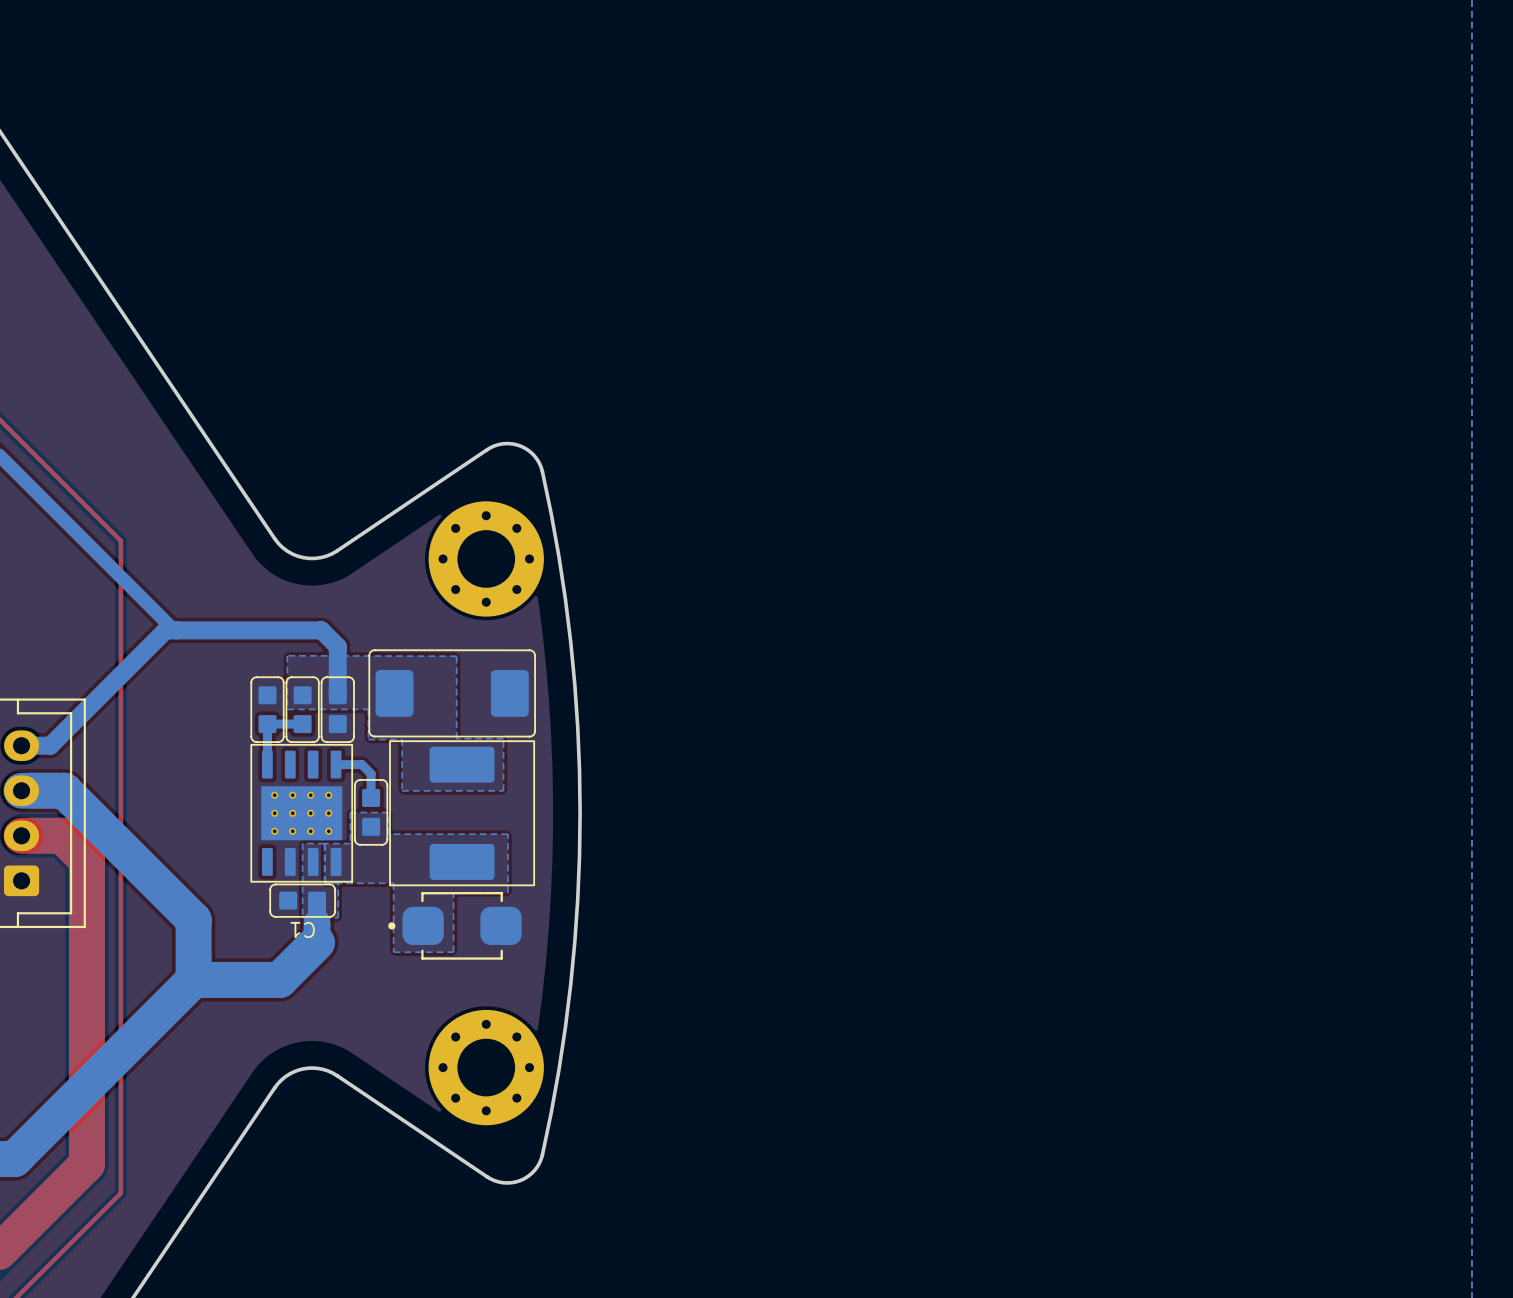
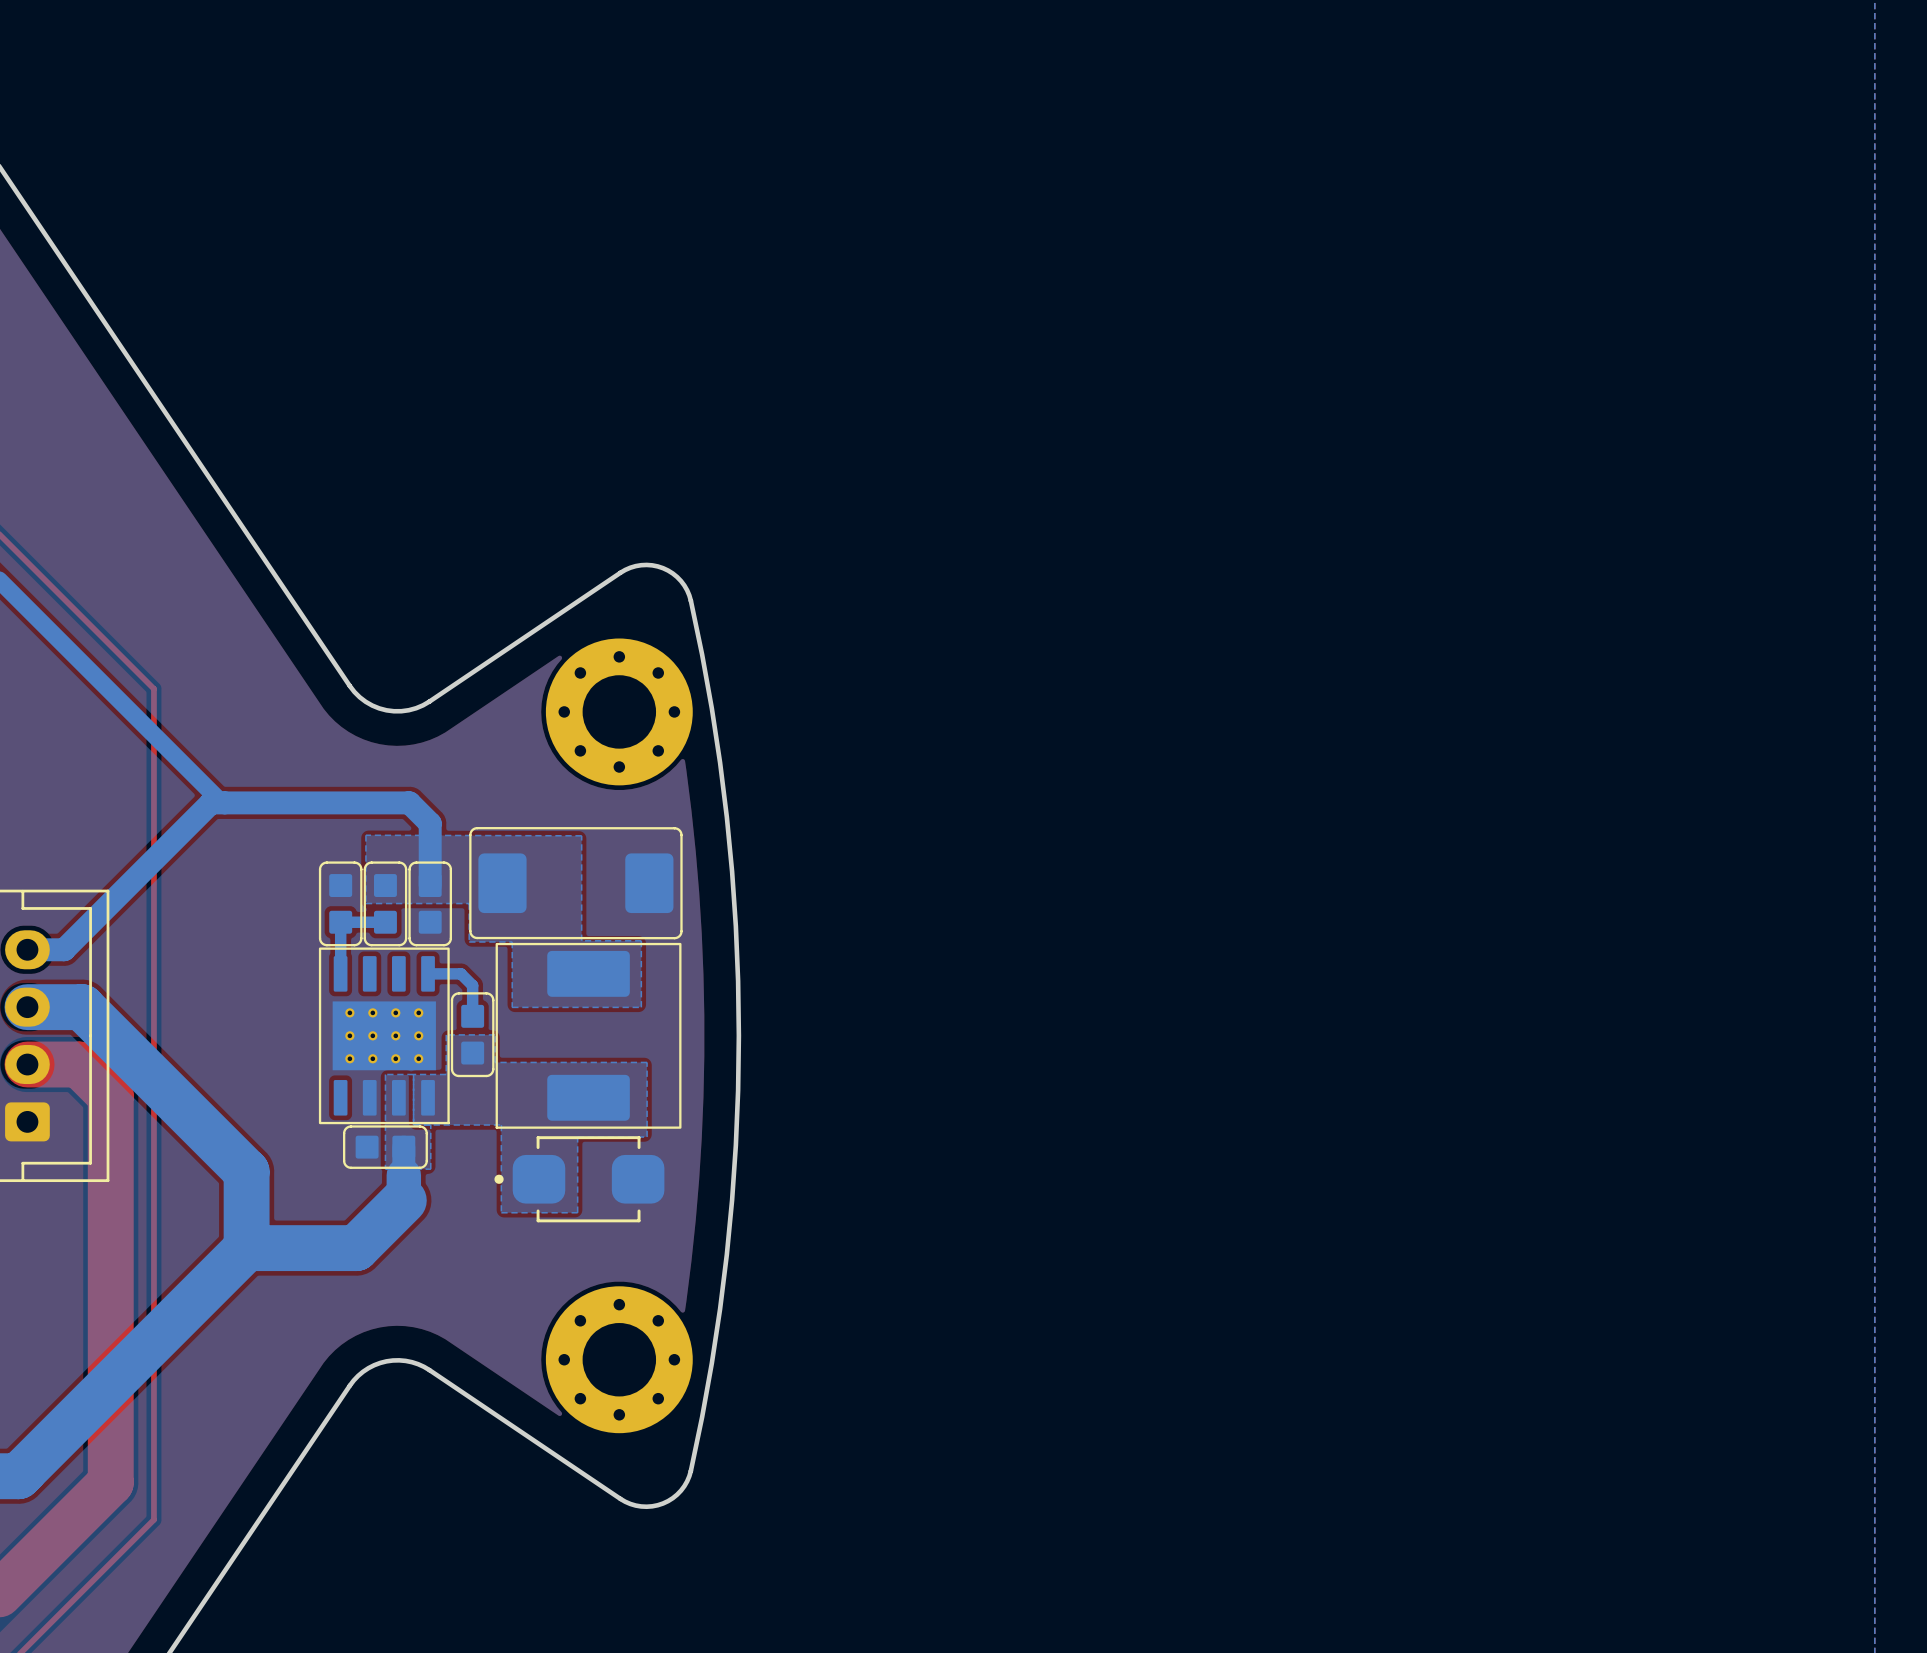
C1 name: C1 (302, 930) -> none

